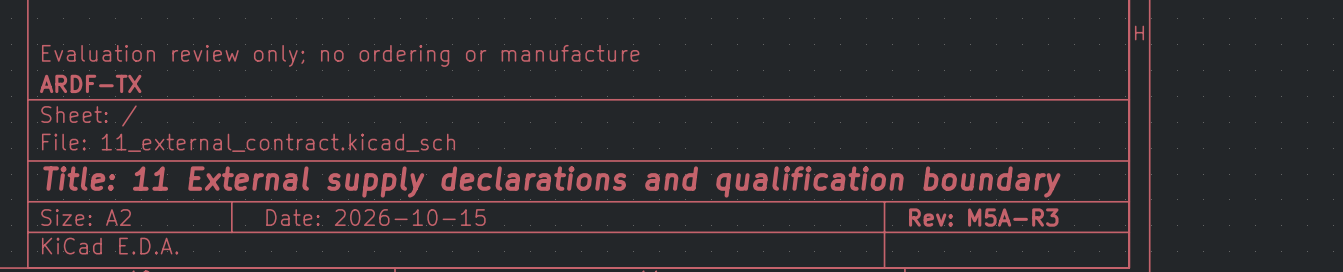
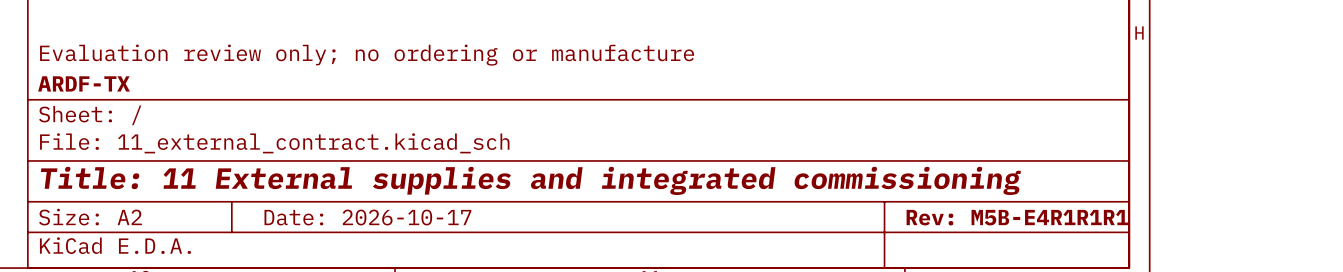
title block: Title: 11 External supply declarations and qualification boundary (551, 181) -> Title: 11 External supplies and integrated commissioning (530, 180)
title block: Date: 2026-10-15 (376, 217) -> Date: 2026-10-17 (367, 217)
title block: Rev: M5A-R3 (983, 217) -> Rev: M5B-E4R1R1R1 (1017, 217)

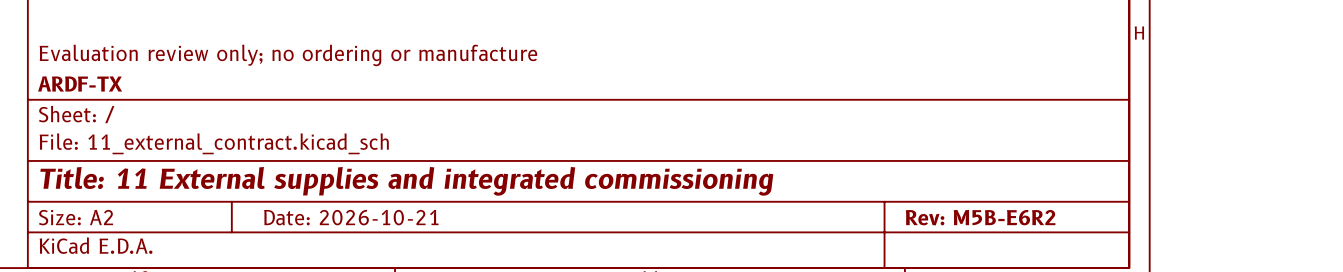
title block: Date: 2026-10-17 (367, 217) -> Date: 2026-10-21 (351, 217)
title block: Rev: M5B-E4R1R1R1 (1017, 217) -> Rev: M5B-E6R2 (980, 217)

